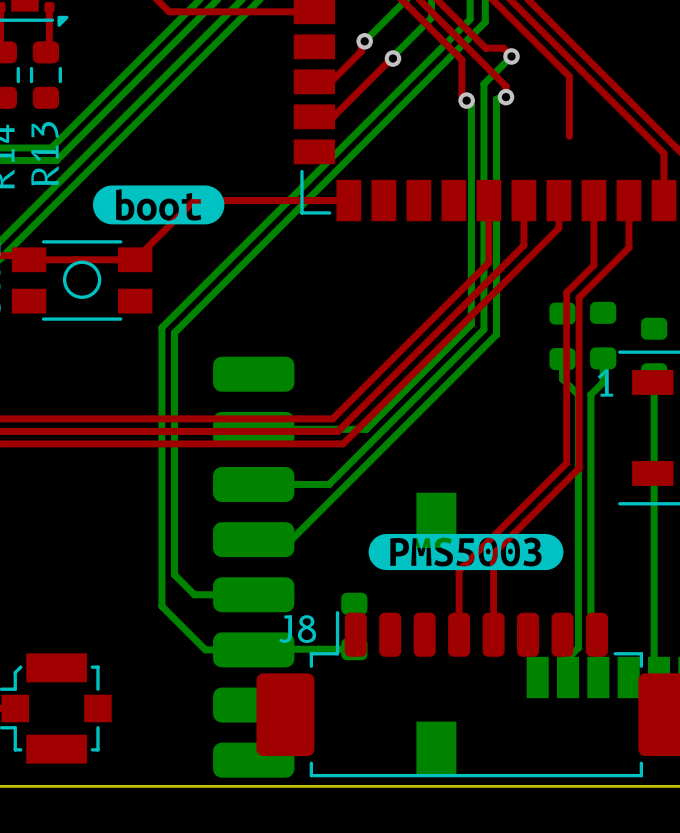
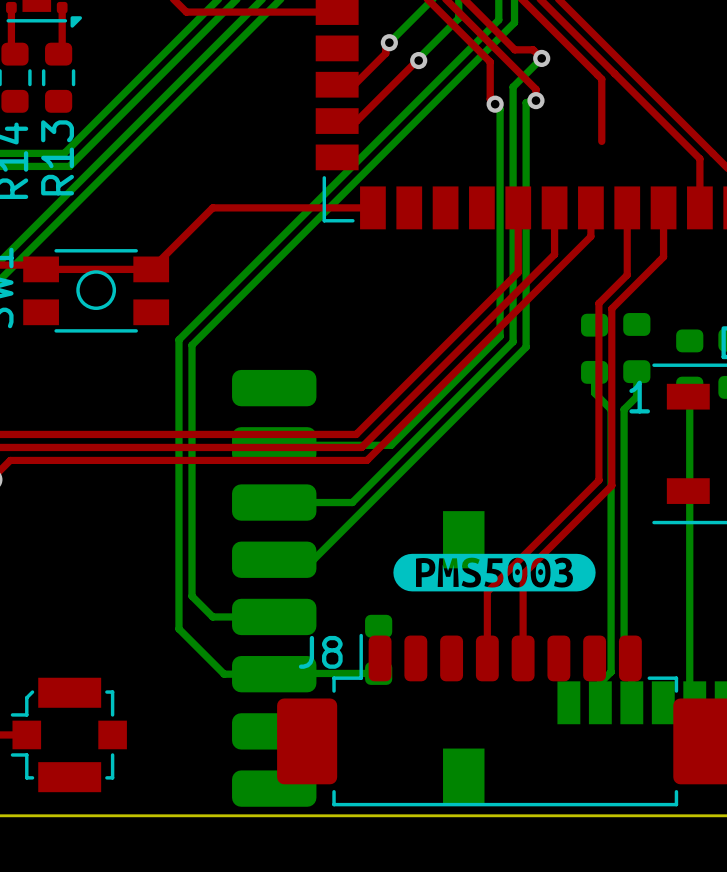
drawing: [92, 185, 225, 225] -> none

